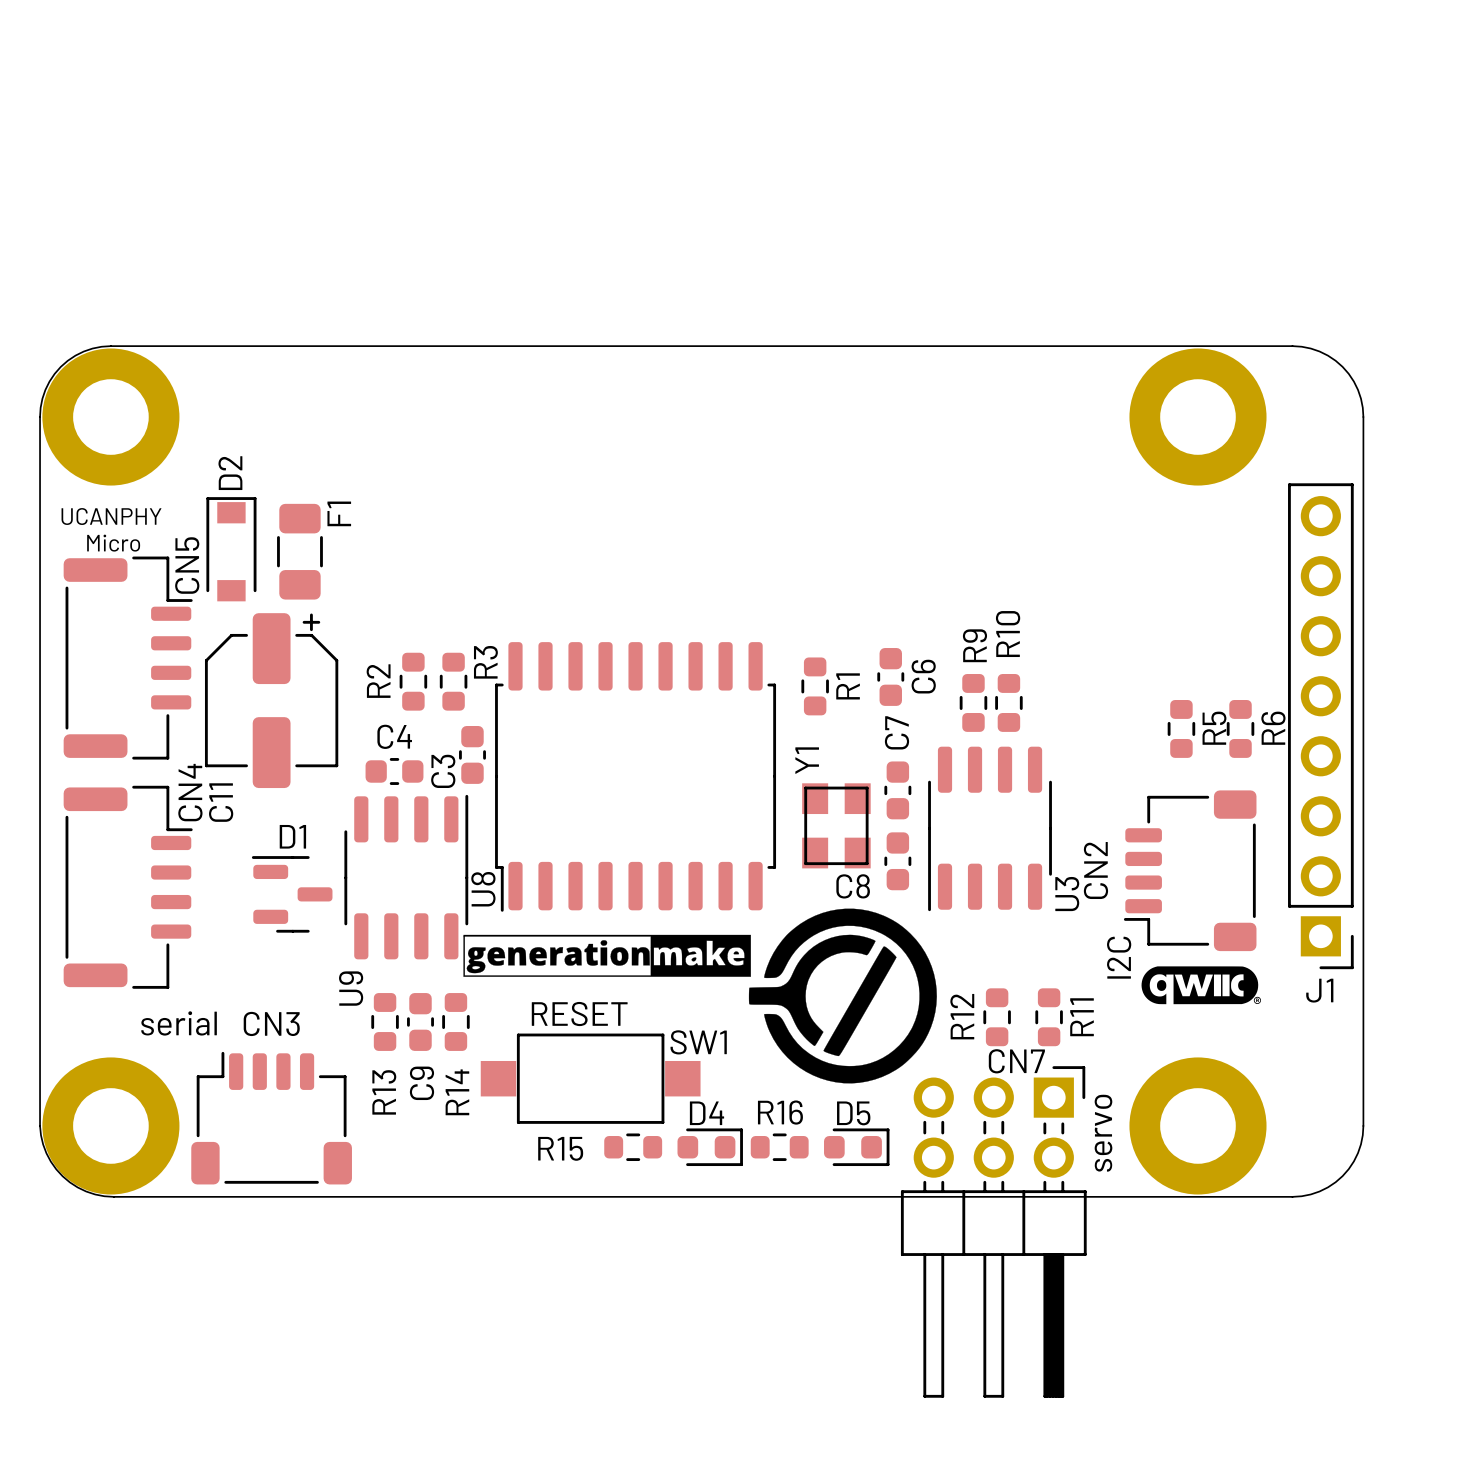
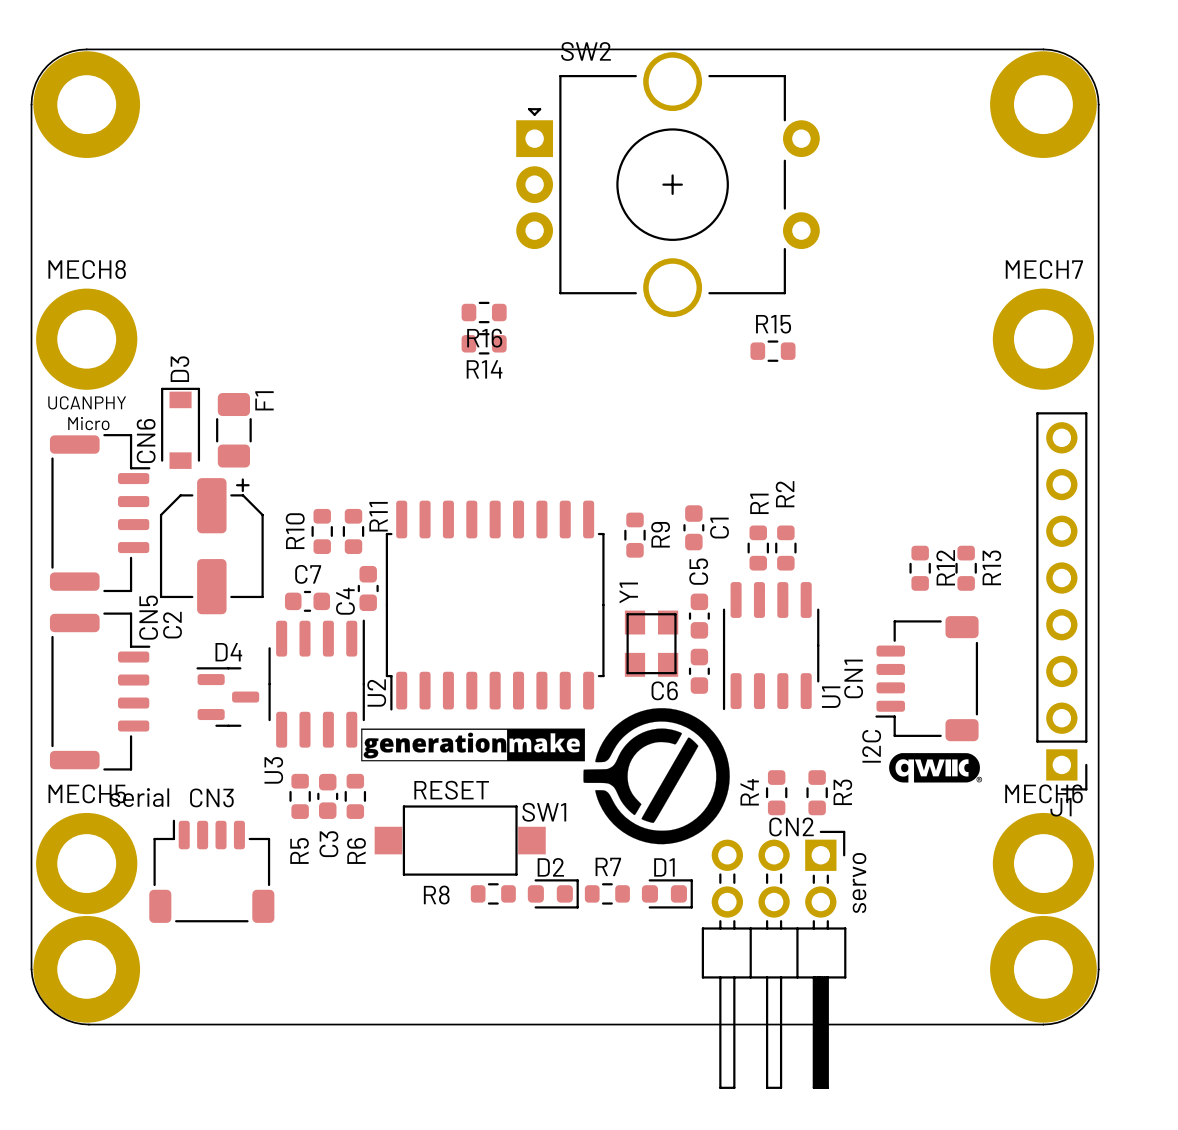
SW2: none -> (668, 184)
R16: none -> (484, 312)
board edge: (40, 417) (45, 389) (60, 366) (83, 351) (110, 346) (1292, 346) (1319, 351) (1342, 366) (1358, 389) (1363, 417) (1363, 1125) (1360, 1144) (1353, 1161) (1342, 1176) (1327, 1187) (1310, 1194) (1292, 1196) (113, 1196) (86, 1191) (62, 1176) (46, 1153) (40, 1125) -> (31, 325) (31, 97) (35, 83) (47, 65) (59, 56) (72, 51) (86, 49) (1043, 49) (1057, 51) (1077, 60) (1087, 71) (1096, 90) (1098, 104) (1098, 969) (1096, 983) (1091, 996) (1077, 1013) (1057, 1022) (1043, 1024) (81, 1024) (67, 1020) (49, 1008) (39, 997) (33, 983) (31, 969) (31, 877)
part position: (110, 417) -> (86, 104)
part position: (1197, 417) -> (1043, 104)
MECH8: none -> (86, 339)
MECH7: none -> (1043, 339)
R14: none -> (484, 343)
R15: none -> (772, 351)
D2 name: D2 (230, 473) -> D3 (179, 369)
CN5 name: CN5 (187, 565) -> CN6 (146, 441)
R10 name: R10 (1008, 634) -> R2 (785, 494)
R9 name: R9 (974, 645) -> R1 (759, 503)
R3 name: R3 (485, 662) -> R11 (378, 516)
C6 name: C6 (923, 676) -> C1 (719, 528)
R2 name: R2 (378, 681) -> R10 (295, 531)
R1 name: R1 (848, 686) -> R9 (660, 534)
J1 position: (1320, 726) -> (1061, 601)
R5 name: R5 (1214, 728) -> R12 (945, 567)
R6 name: R6 (1273, 728) -> R13 (991, 567)
C7 name: C7 (896, 732) -> C5 (698, 571)
C4 name: C4 (394, 736) -> C7 (308, 574)
C3 name: C3 (443, 771) -> C4 (345, 601)
CN4 name: CN4 (190, 792) -> CN5 (148, 617)
C11 name: C11 (221, 802) -> C2 (172, 625)
D1 name: D1 (292, 836) -> D4 (228, 652)
CN2 name: CN2 (1095, 870) -> CN1 (853, 678)
C8 name: C8 (853, 886) -> C6 (664, 690)
U8 name: U8 (483, 889) -> U2 (376, 693)
U3 name: U3 (1067, 894) -> U1 (831, 697)
U9 name: U9 (351, 988) -> U3 (273, 770)
R12 name: R12 (962, 1016) -> R4 (749, 792)
R11 name: R11 (1082, 1017) -> R3 (842, 792)
CN7 name: CN7 (1016, 1061) -> CN2 (791, 827)
C9 name: C9 (421, 1083) -> C3 (328, 844)
R13 name: R13 (384, 1092) -> R5 (299, 851)
R14 name: R14 (457, 1092) -> R6 (356, 851)
MECH5: none -> (86, 863)
MECH6: none -> (1043, 863)
R16 name: R16 (780, 1112) -> R7 (608, 866)
D4 name: D4 (707, 1113) -> D2 (550, 867)
D5 name: D5 (853, 1113) -> D1 (664, 867)
part position: (110, 1125) -> (86, 969)
part position: (1197, 1125) -> (1043, 969)
R15 name: R15 (560, 1148) -> R8 (436, 895)

